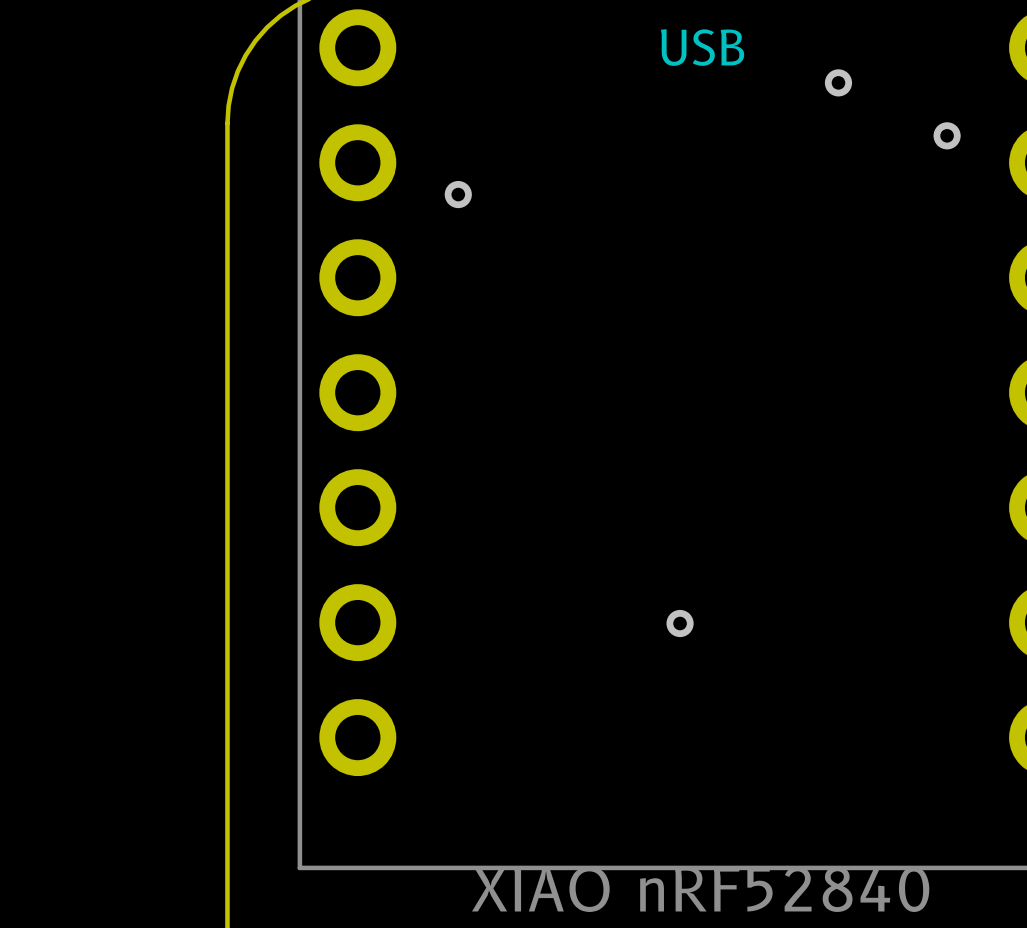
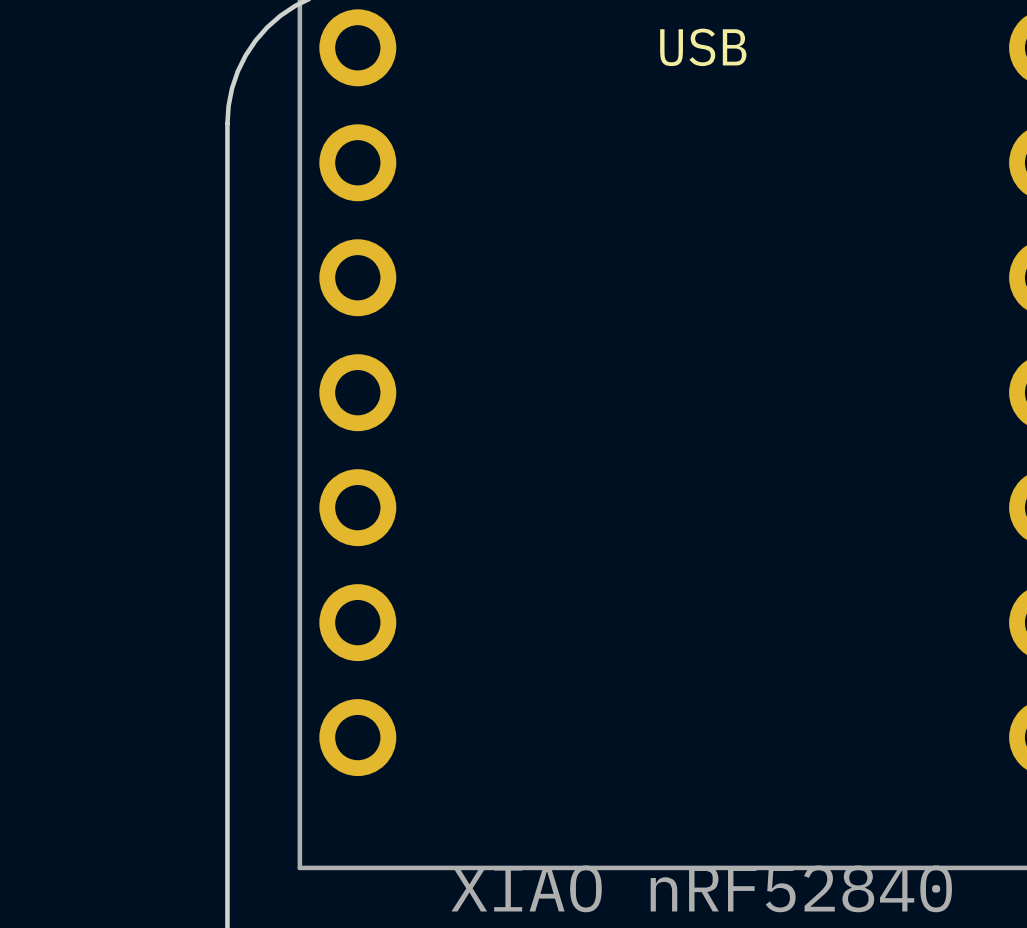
via: (838, 82) -> none
via: (947, 135) -> none
via: (458, 194) -> none
via: (680, 623) -> none

